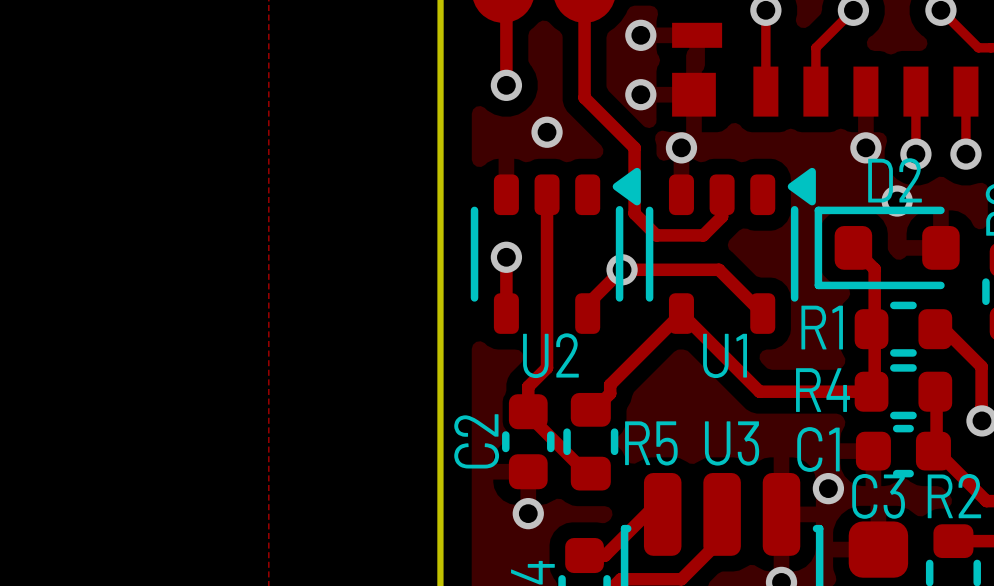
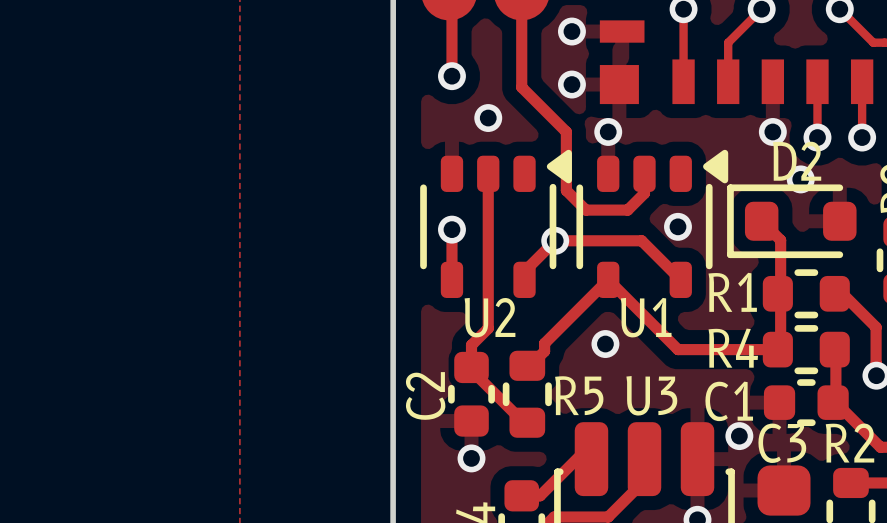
via: none -> (677, 226)
via: none -> (605, 344)

